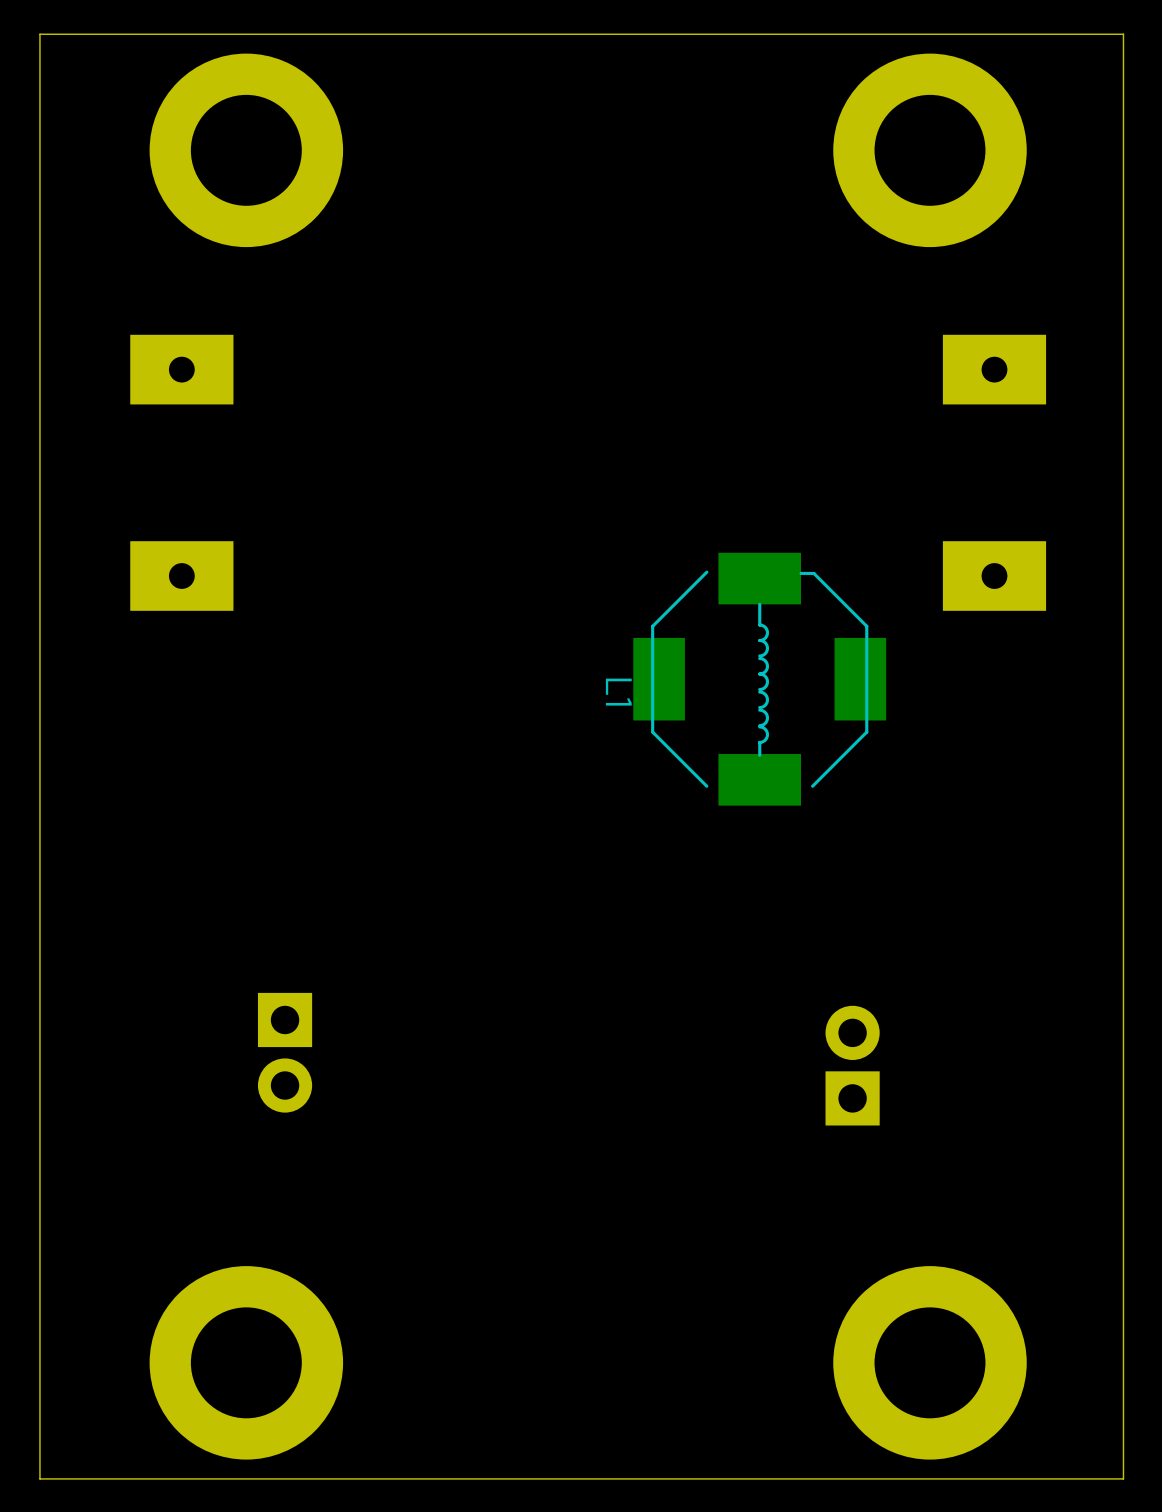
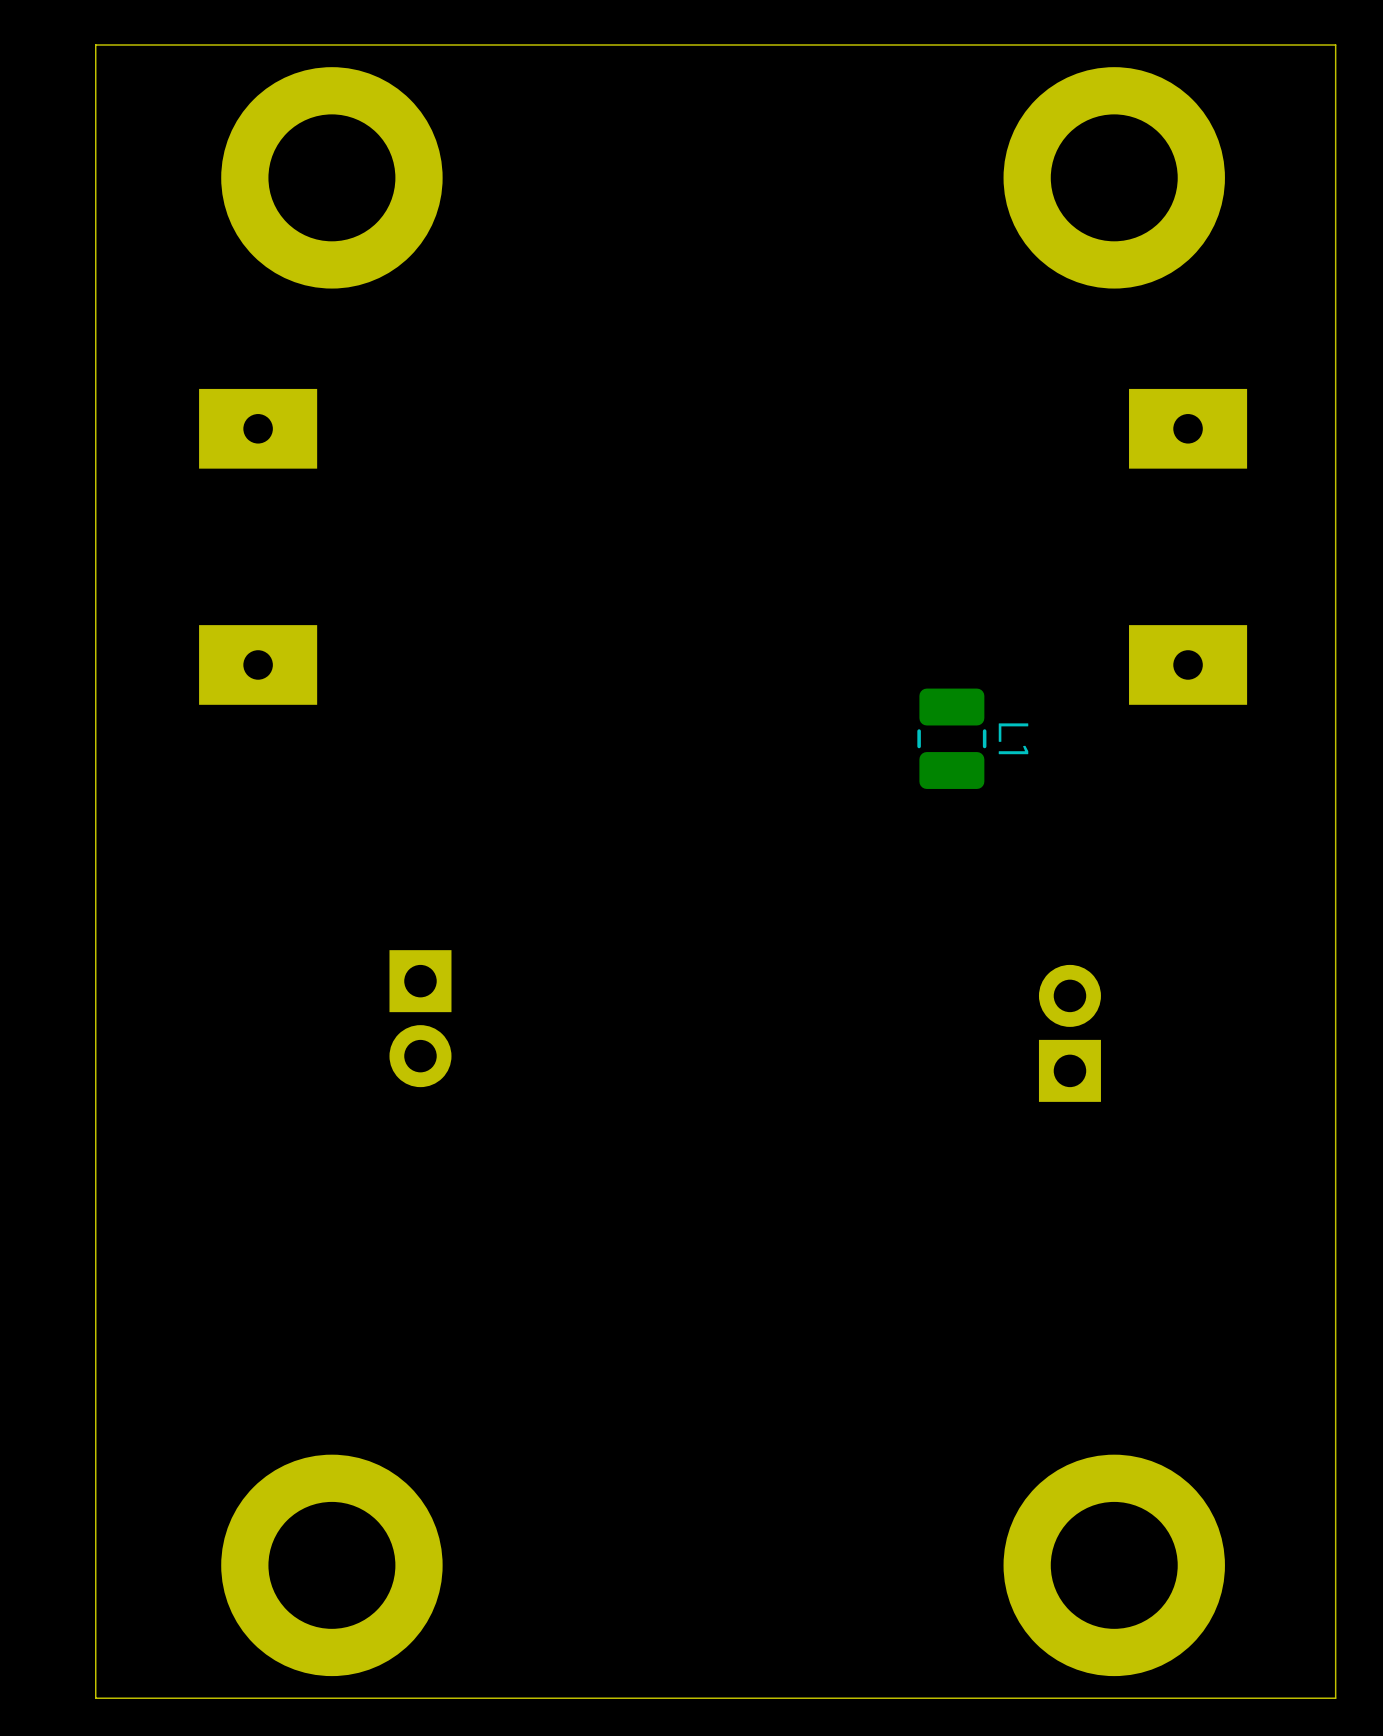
L1 footprint: [633, 552, 887, 806] -> [917, 688, 987, 789]
L1 name position: L1 (618, 692) -> L1 (1013, 738)
part position: (285, 1052) -> (420, 1018)
part position: (852, 1065) -> (1069, 1033)

